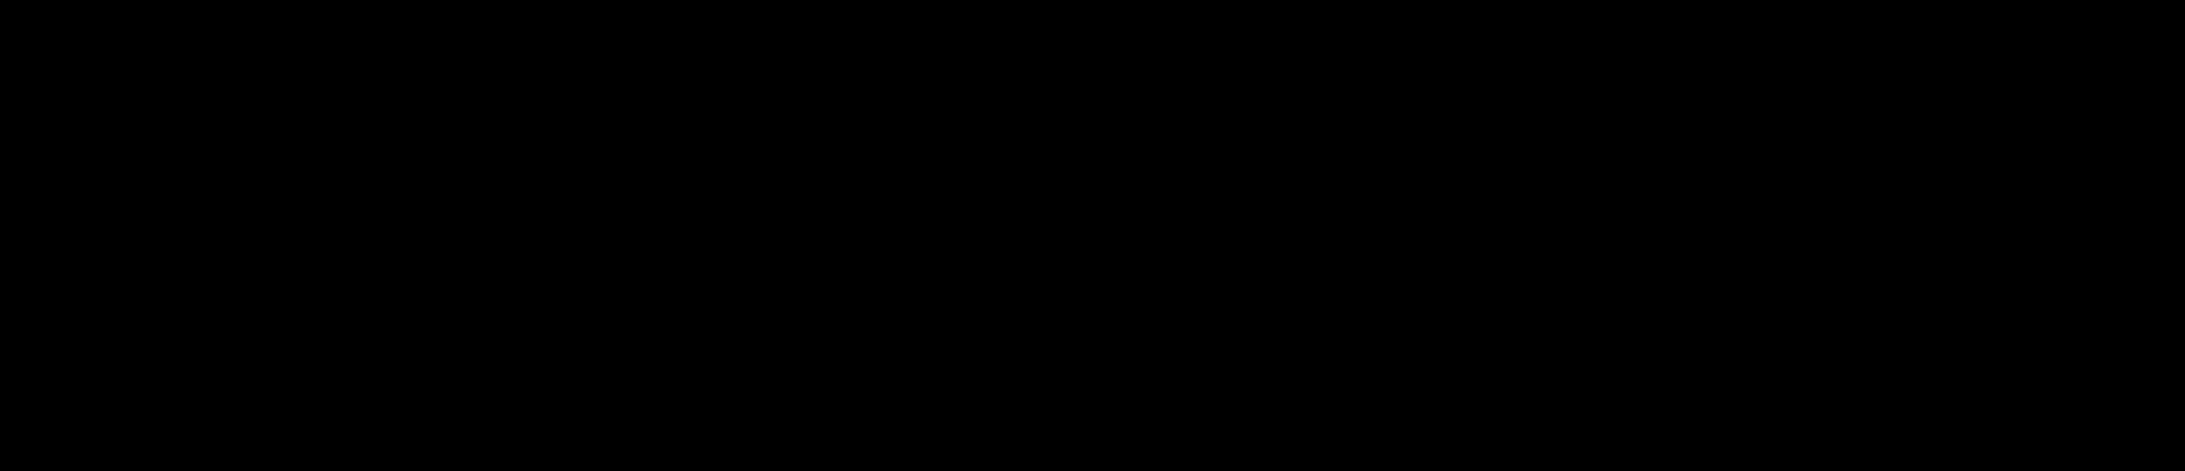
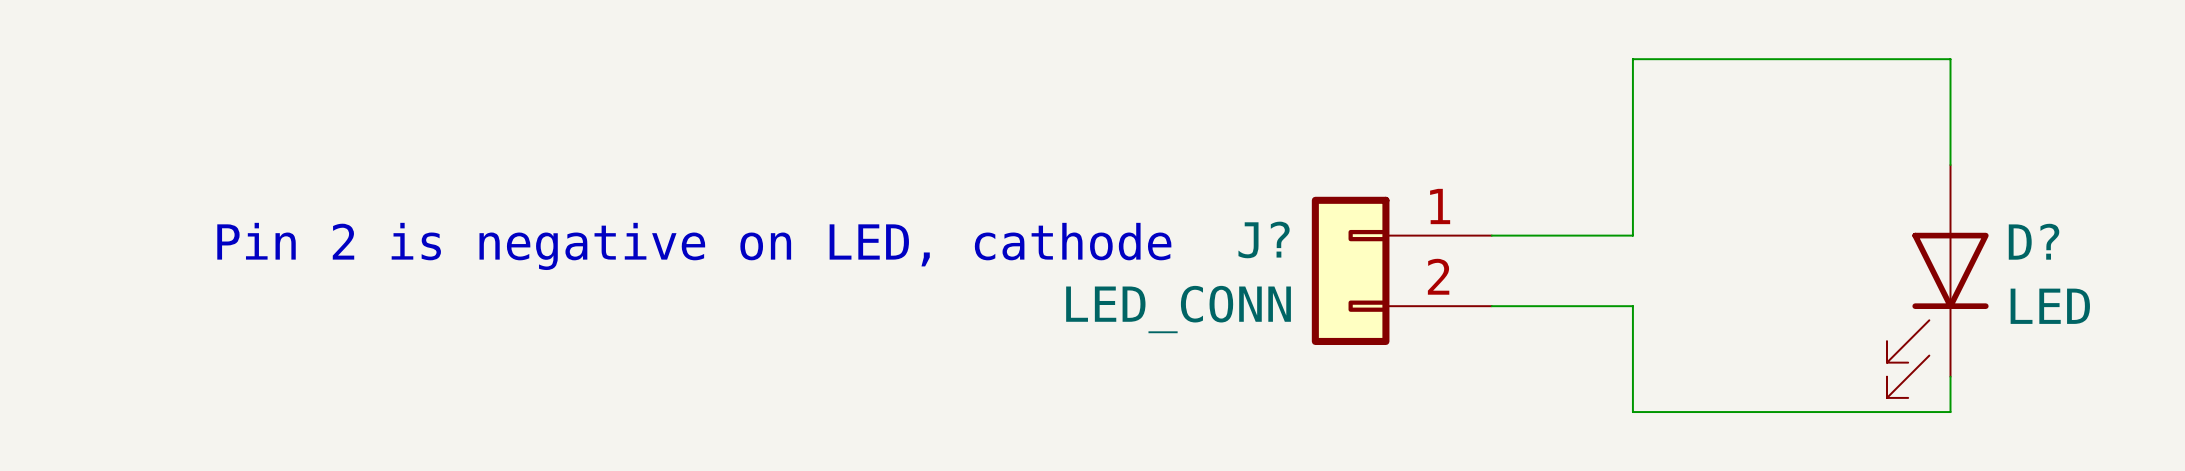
wire: none -> (1950, 165) (1950, 59) (1632, 59) (1632, 235) (1491, 235)
text: none -> Pin 2 is negative on LED, cathode (694, 246)
J?: none -> LED_CONN (1401, 270)
D?: none -> LED (1937, 281)
wire: none -> (1491, 306) (1632, 306) (1632, 412) (1950, 412) (1950, 376)

